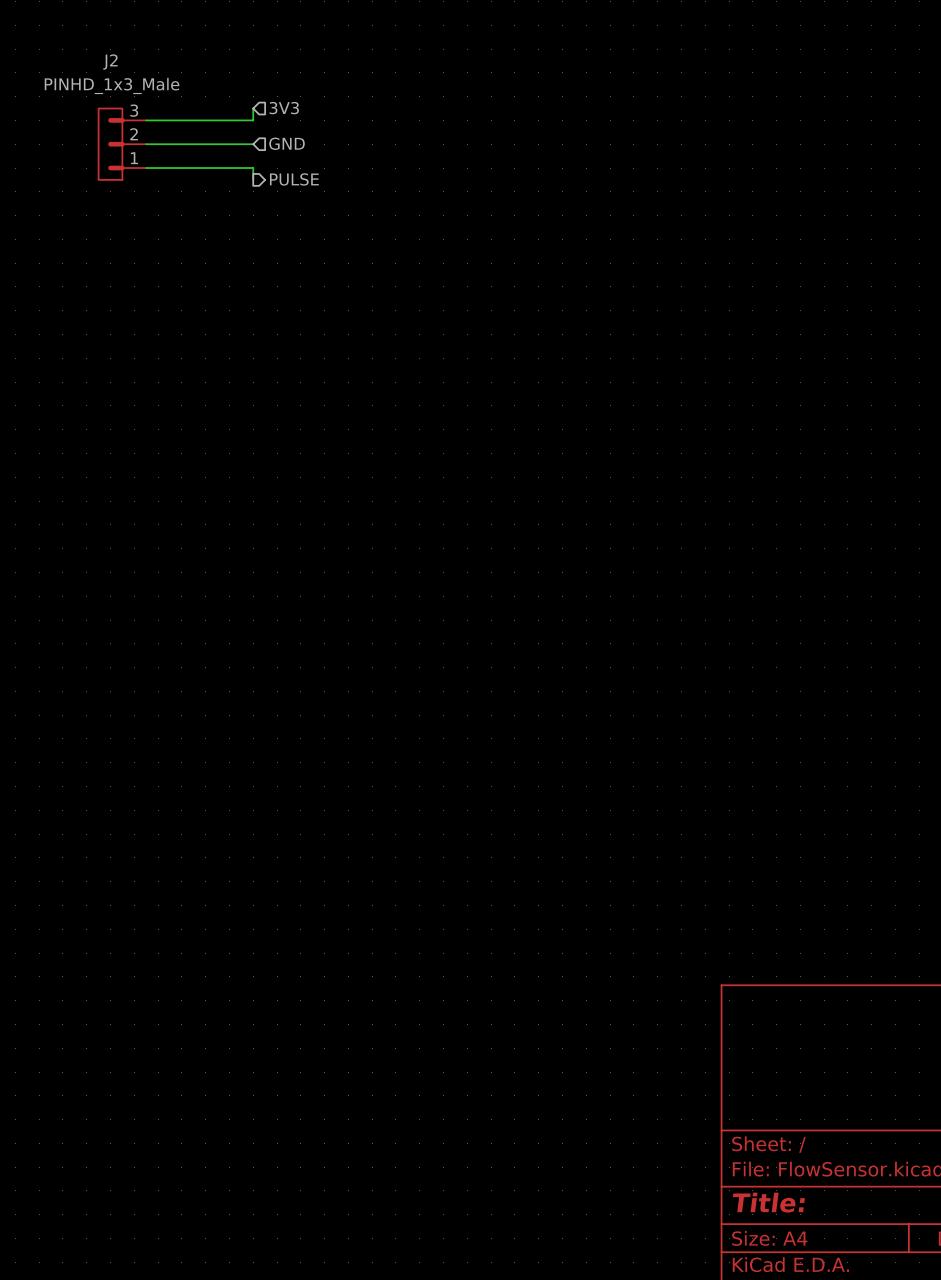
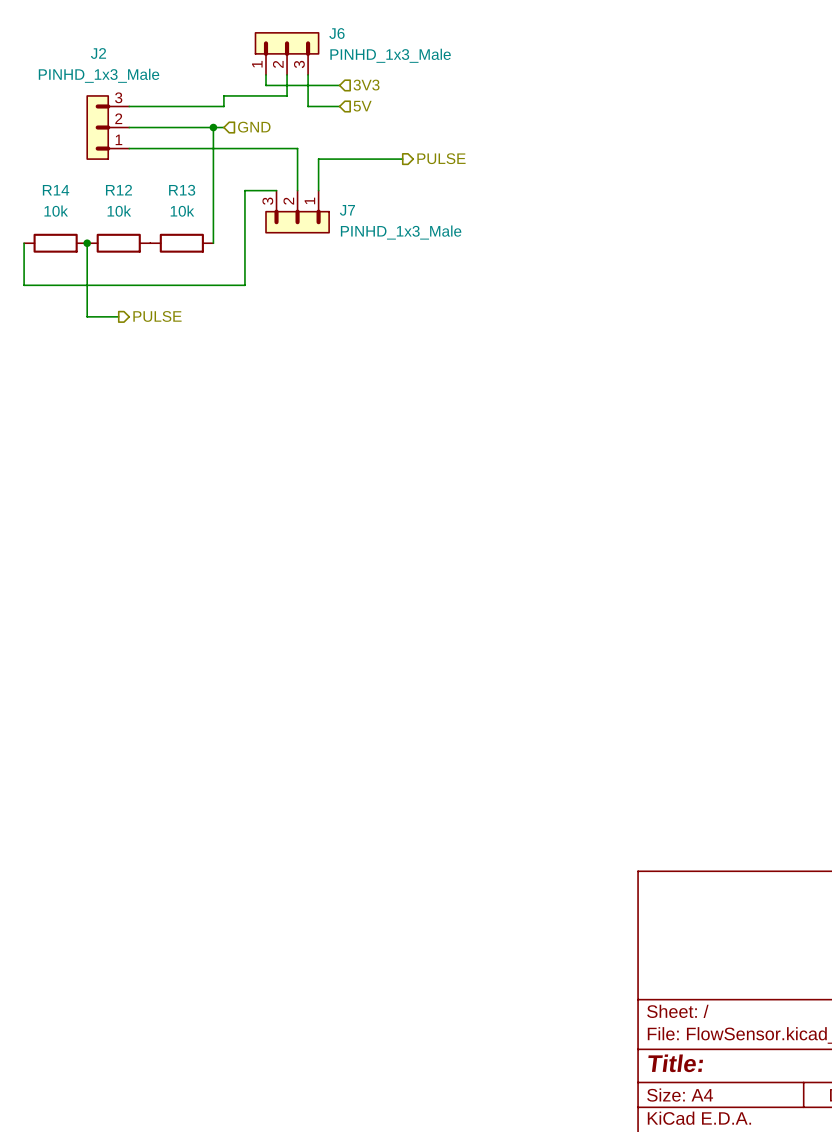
J6: none -> PINHD_1x3_Male (287, 53)
wire: none -> (266, 74) (266, 85) (339, 85)
wire: none -> (287, 74) (287, 95) (223, 95)
wire: none -> (308, 74) (308, 106) (339, 106)
hierarchical label position: 3V3 (284, 108) -> 3V3 (366, 85)
hierarchical label: none -> 5V (362, 106)
wire: none -> (213, 127) (213, 243)
junction: none -> (213, 127)
wire: (253, 168) (253, 179) -> (223, 148) (297, 148) (297, 190)
hierarchical label: PULSE (294, 179) -> none
wire: none -> (402, 159) (318, 159) (318, 190)
hierarchical label: none -> PULSE (441, 158)
wire: none -> (276, 190) (244, 190) (244, 285) (24, 285) (24, 243)
J7: none -> PINHD_1x3_Male (297, 211)
R14: none -> 10k (55, 243)
wire: none -> (87, 243) (87, 316) (118, 316)
junction: none -> (87, 243)
R12: none -> 10k (118, 243)
R13: none -> 10k (181, 243)
hierarchical label: none -> PULSE (157, 316)

